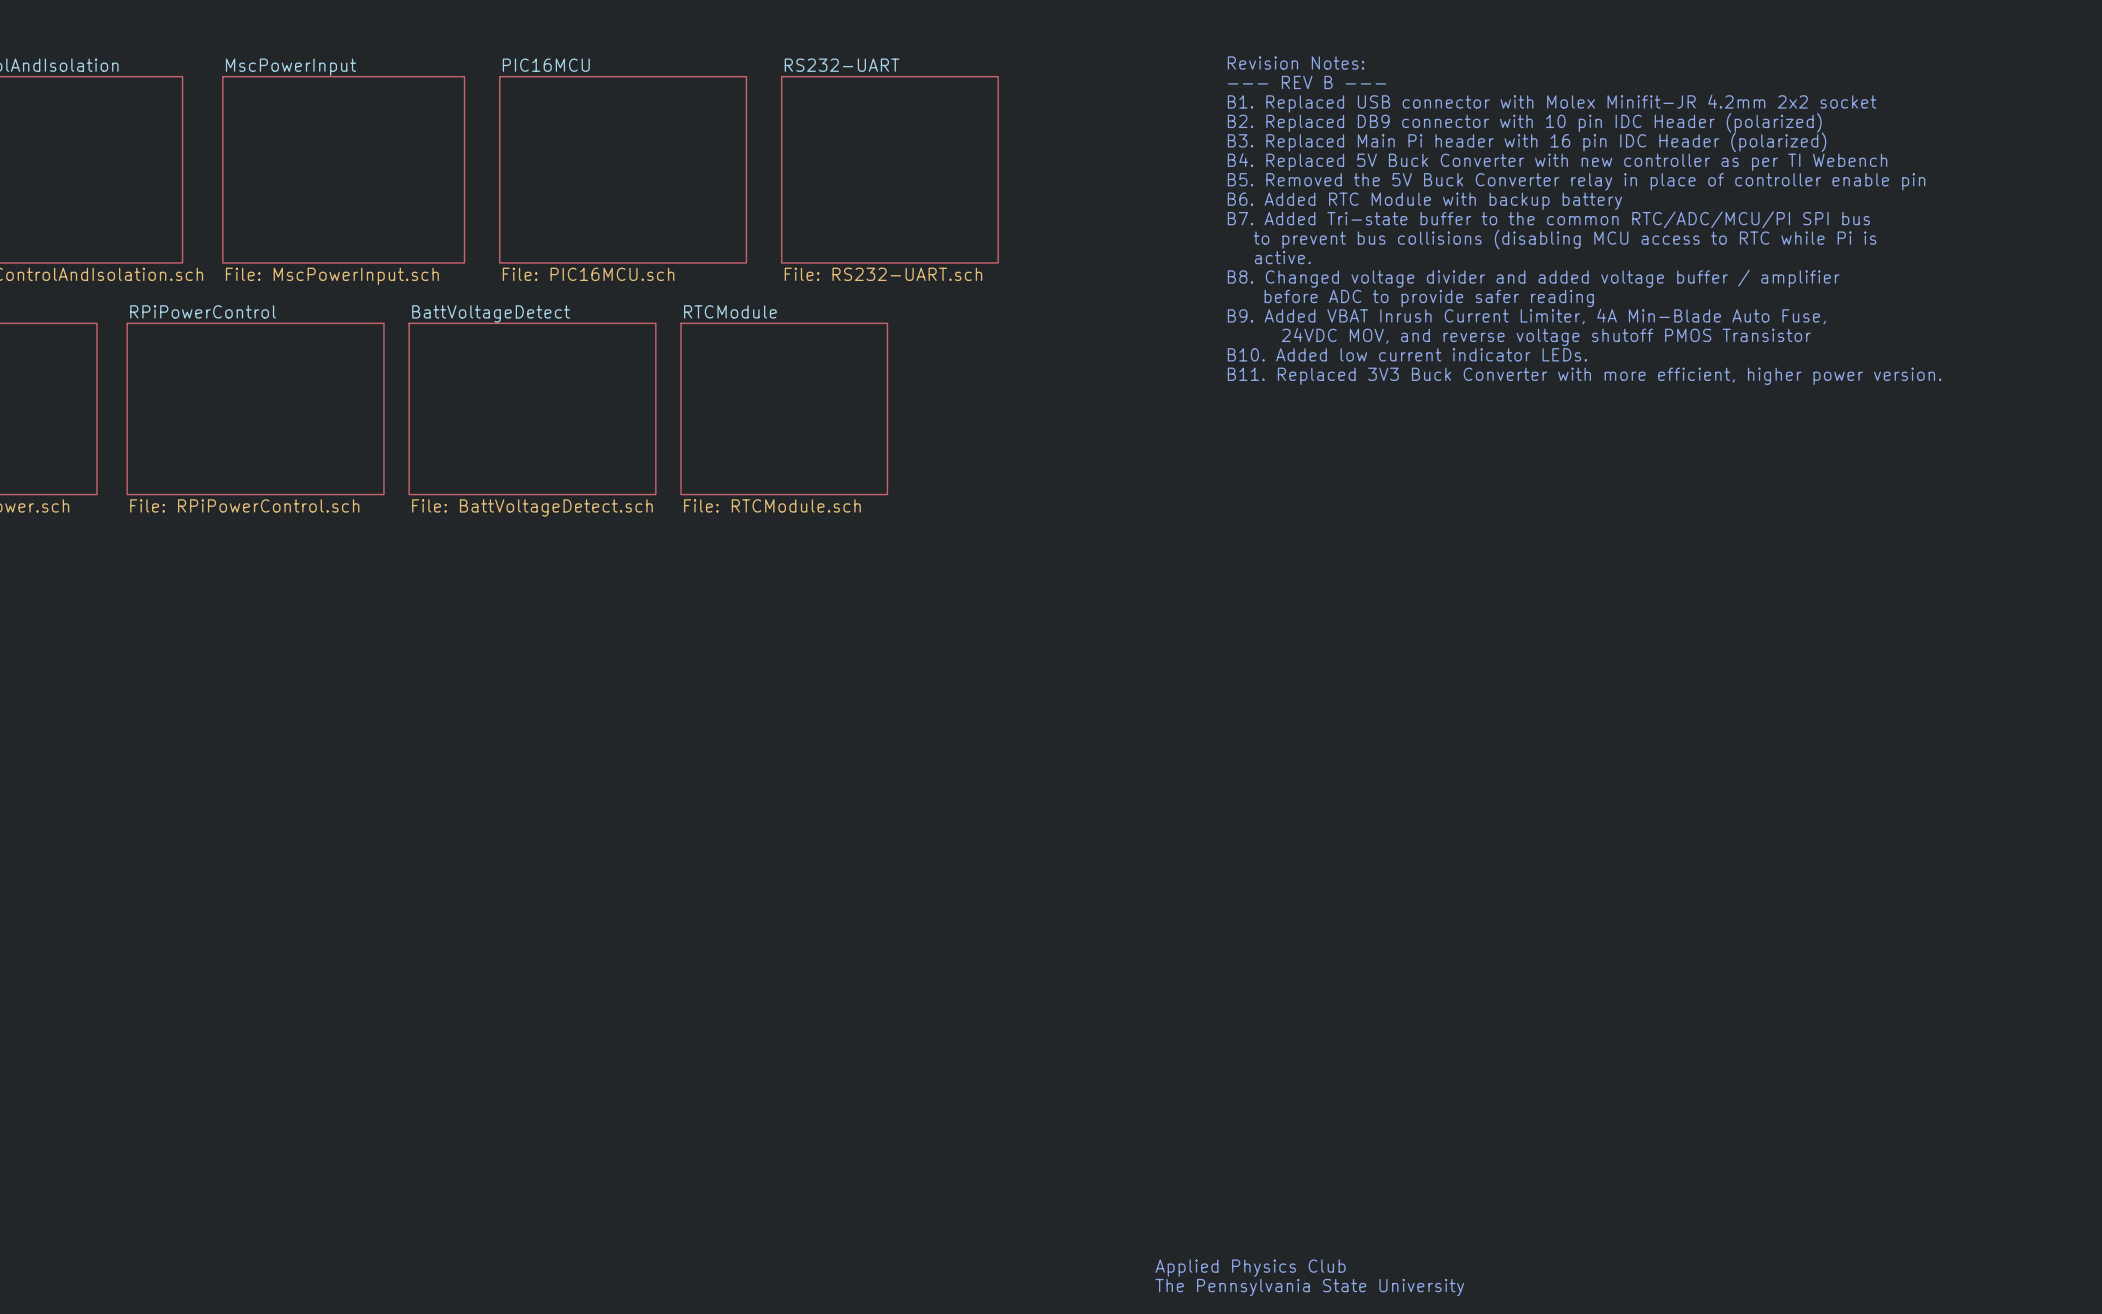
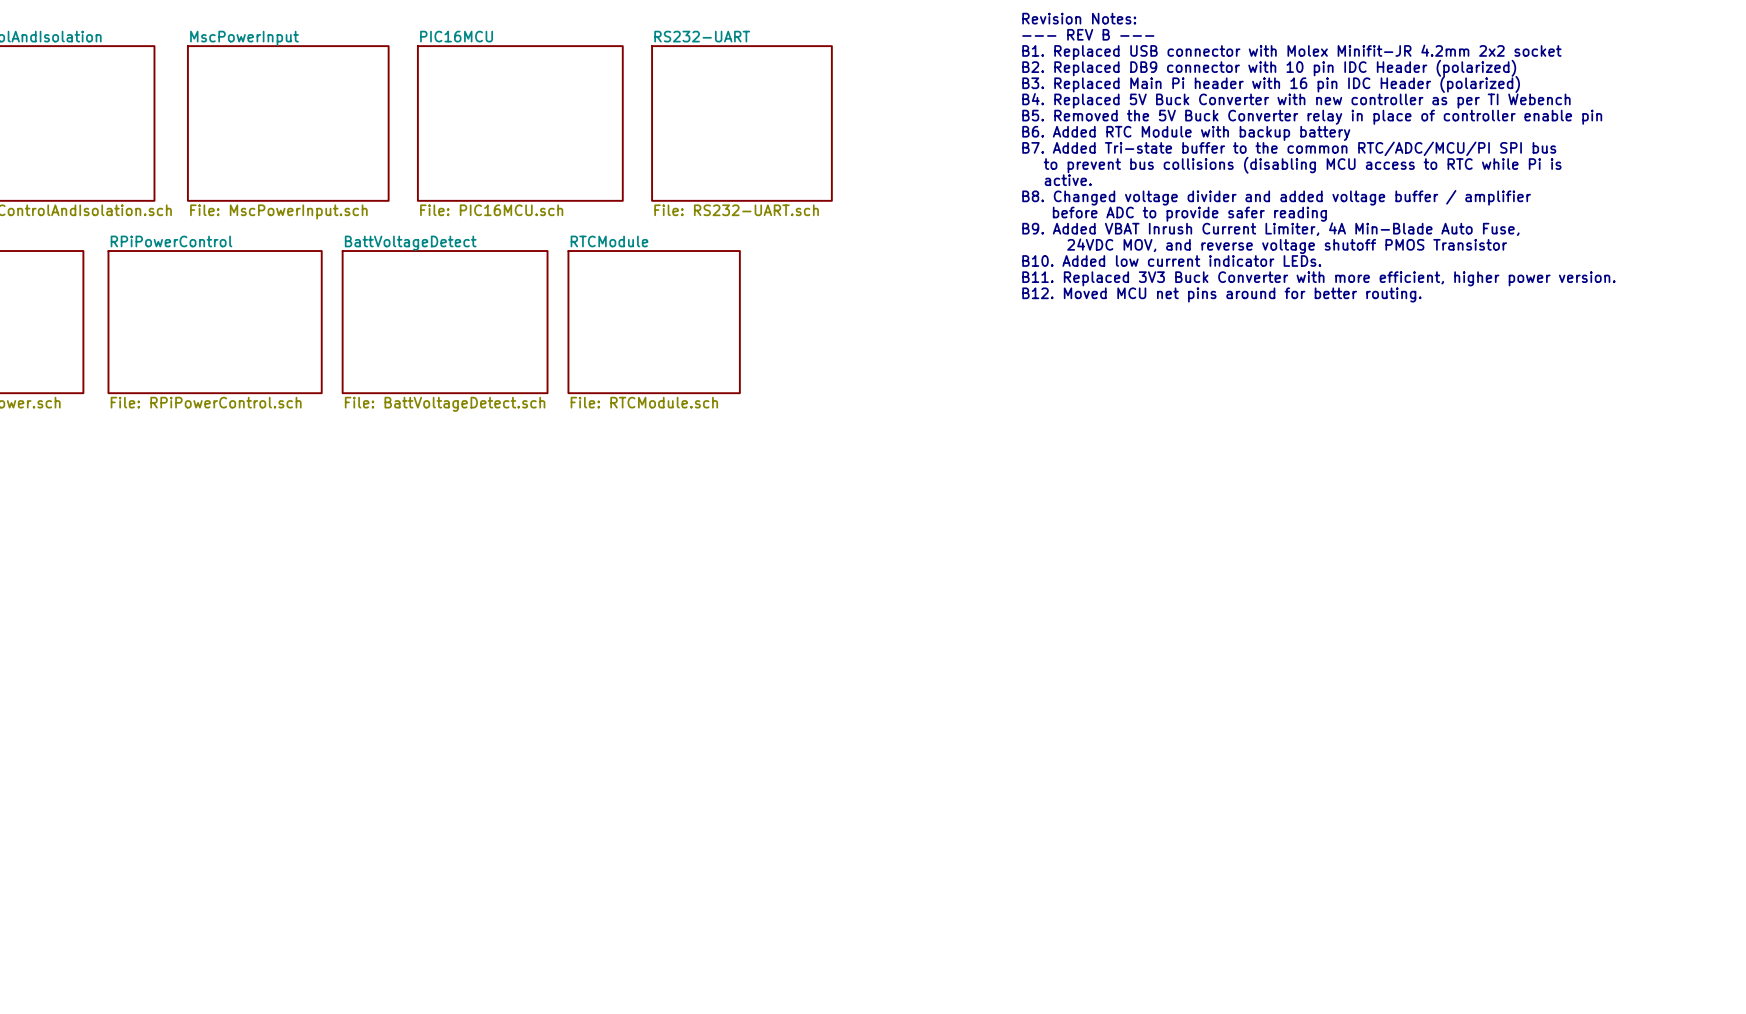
text: none -> Revision Notes: (1079, 18)
text: Revision Notes: (1296, 63) -> --- REV B --- (1088, 34)
text: --- REV B --- (1306, 82) -> B1. Replaced USB connector with Molex Minifit-JR 4.2mm 2x2 socket (1291, 52)
text: B1. Replaced USB connector with Molex Minifit-JR 4.2mm 2x2 socket (1552, 103) -> B2. Replaced DB9 connector with 10 pin IDC Header (polarized) (1269, 68)
text: B2. Replaced DB9 connector with 10 pin IDC Header (polarized) (1524, 122) -> B3. Replaced Main Pi header with 16 pin IDC Header (polarized) (1271, 84)
text: B3. Replaced Main Pi header with 16 pin IDC Header (polarized) (1527, 142) -> B4. Replaced 5V Buck Converter with new controller as per TI Webench (1296, 100)
text: B4. Replaced 5V Buck Converter with new controller as per TI Webench (1557, 162) -> B5. Removed the 5V Buck Converter relay in place of controller enable pin (1312, 117)
text: B5. Removed the 5V Buck Converter relay in place of controller enable pin (1576, 181) -> B6. Added RTC Module with backup battery (1186, 133)
text: B6. Added RTC Module with backup battery (1424, 201) -> B7. Added Tri-state buffer to the common RTC/ADC/MCU/PI SPI bus (1289, 148)
text: B7. Added Tri-state buffer to the common RTC/ADC/MCU/PI SPI bus (1548, 219) -> to prevent bus collisions (disabling MCU access to RTC while Pi is (1302, 165)
text: to prevent bus collisions (disabling MCU access to RTC while Pi is (1565, 239) -> active. (1068, 180)
text: active. (1282, 257) -> B8. Changed voltage divider and added voltage buffer / amplifier (1276, 197)
text: B8. Changed voltage divider and added voltage buffer / amplifier (1533, 278) -> before ADC to provide safer reading (1189, 214)
text: before ADC to provide safer reading (1429, 298) -> B9. Added VBAT Inrush Current Limiter, 4A Min-Blade Auto Fuse, (1270, 229)
text: B9. Added VBAT Inrush Current Limiter, 4A Min-Blade Auto Fuse, (1526, 316) -> 24VDC MOV, and reverse voltage shutoff PMOS Transistor (1287, 246)
text: 24VDC MOV, and reverse voltage shutoff PMOS Transistor (1546, 337) -> B10. Added low current indicator LEDs. (1171, 260)
text: B10. Added low current indicator LEDs. (1407, 354) -> B11. Replaced 3V3 Buck Converter with more efficient, higher power version. (1318, 278)
text: B11. Replaced 3V3 Buck Converter with more efficient, higher power version. (1584, 376) -> B12. Moved MCU net pins around for better routing. (1221, 294)

